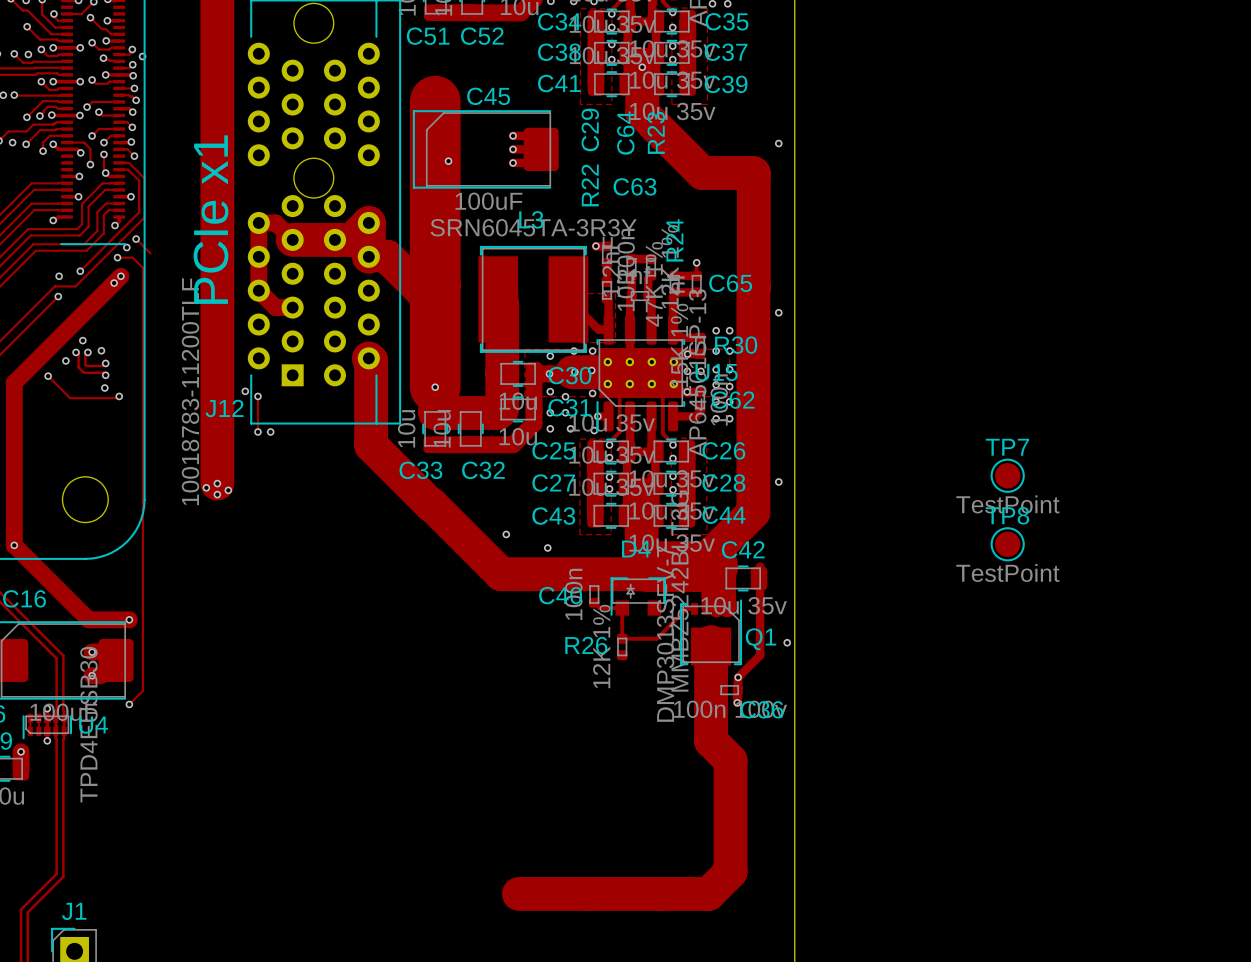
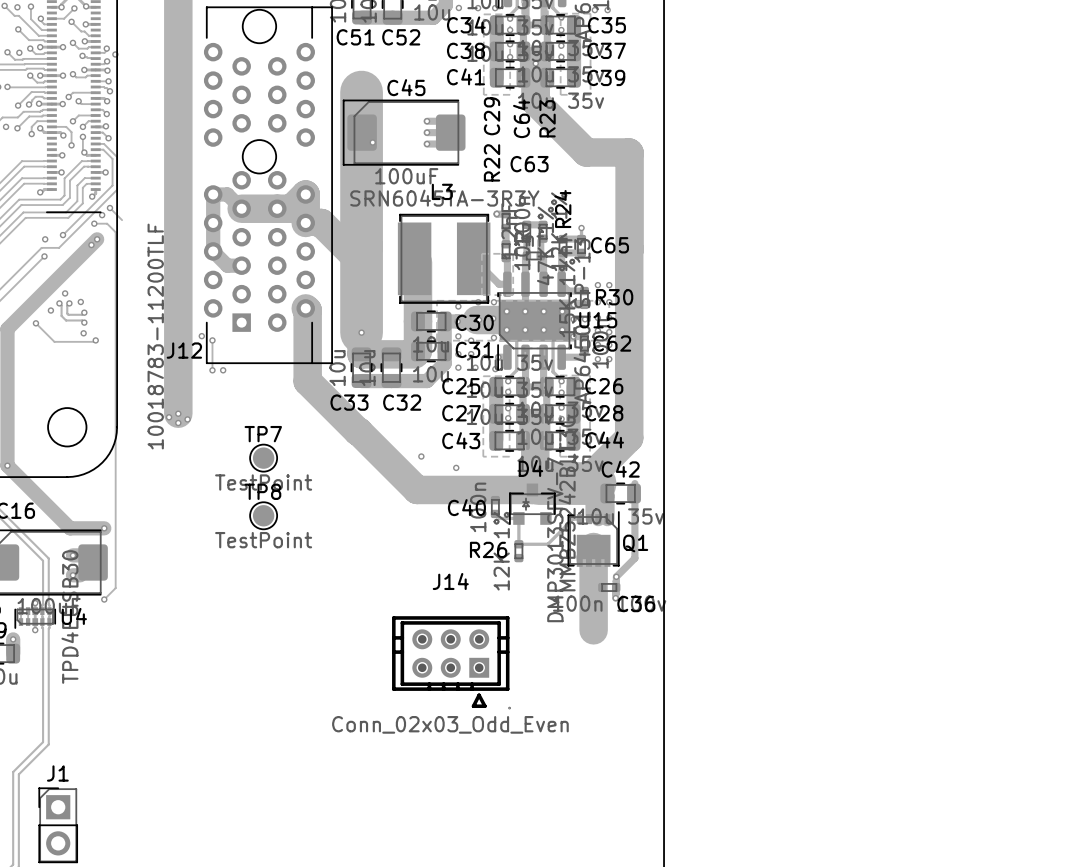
via: (778, 143) -> none
text: PCIe x1 (211, 219) -> none
via: (778, 312) -> none
TP7 position: (1007, 475) -> (263, 458)
via: (778, 481) -> none
TP8 position: (1007, 544) -> (263, 515)
via: (787, 642) -> none
track: (711, 741) (730, 760) (730, 871) (708, 893) (518, 893) -> none
J14: none -> Conn_02x03_Odd_Even (451, 662)

